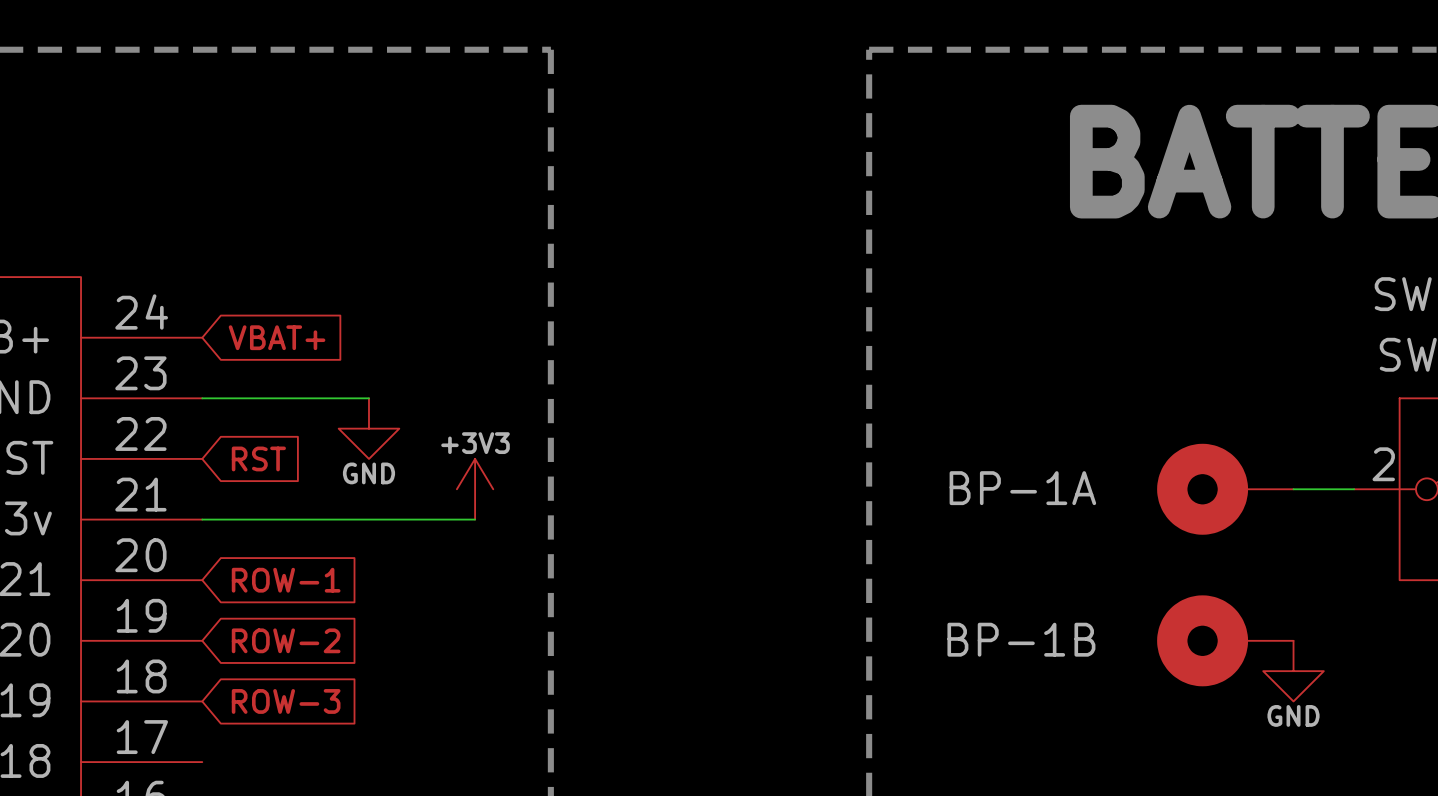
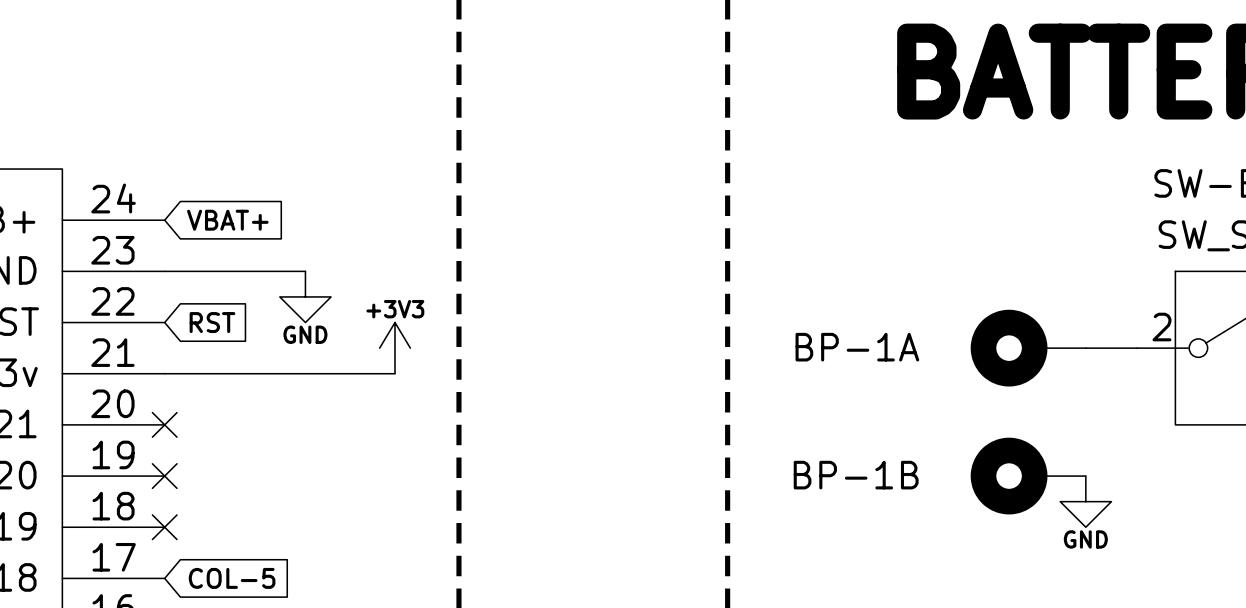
no-connect mark: none -> (164, 424)
global label: ROW-1 (286, 580) -> none
no-connect mark: none -> (164, 476)
global label: ROW-2 (286, 640) -> none
no-connect mark: none -> (164, 527)
global label: ROW-3 (286, 701) -> none
global label: none -> COL-5 (232, 578)

